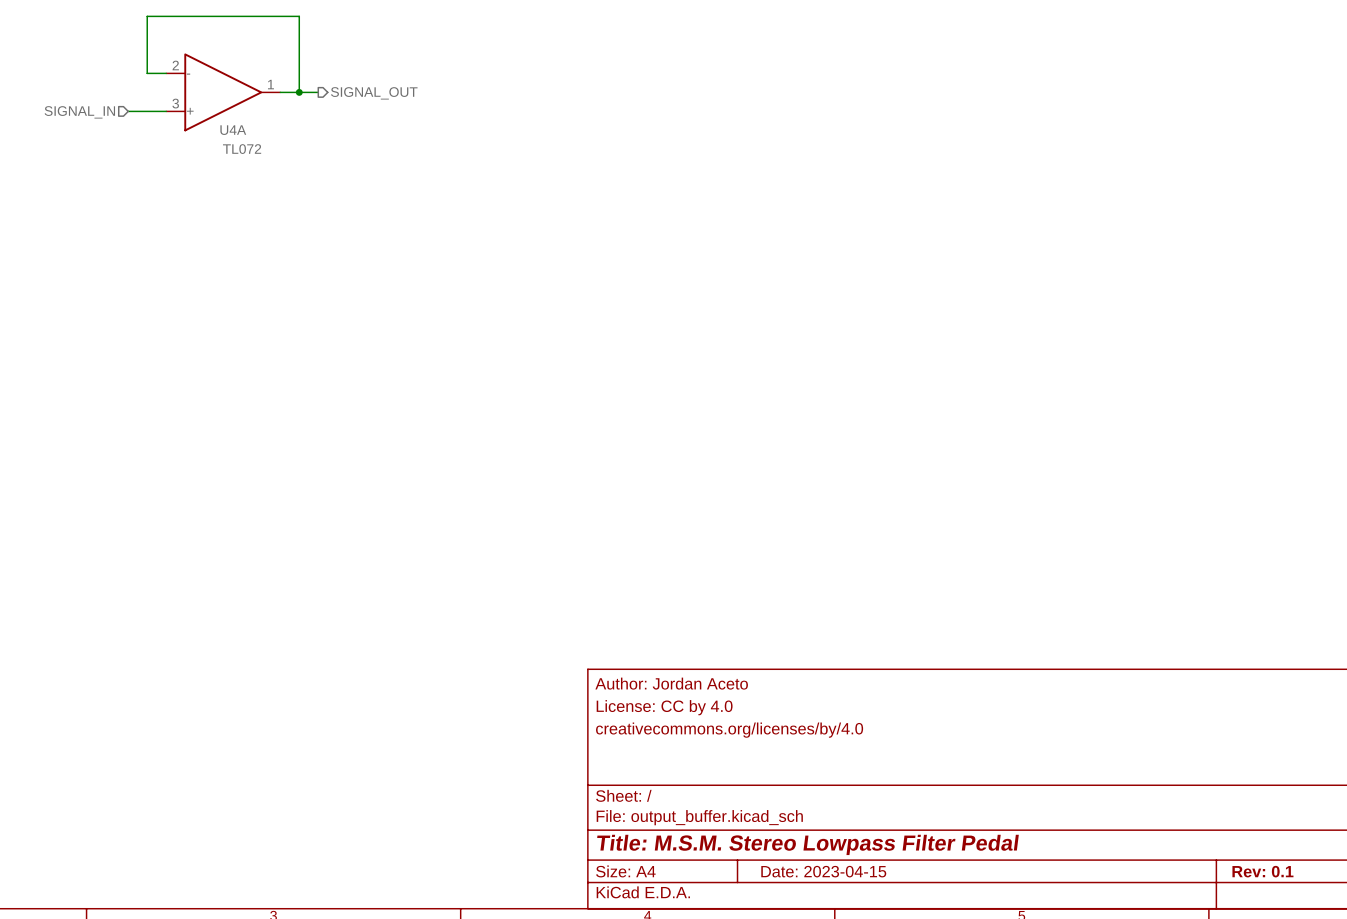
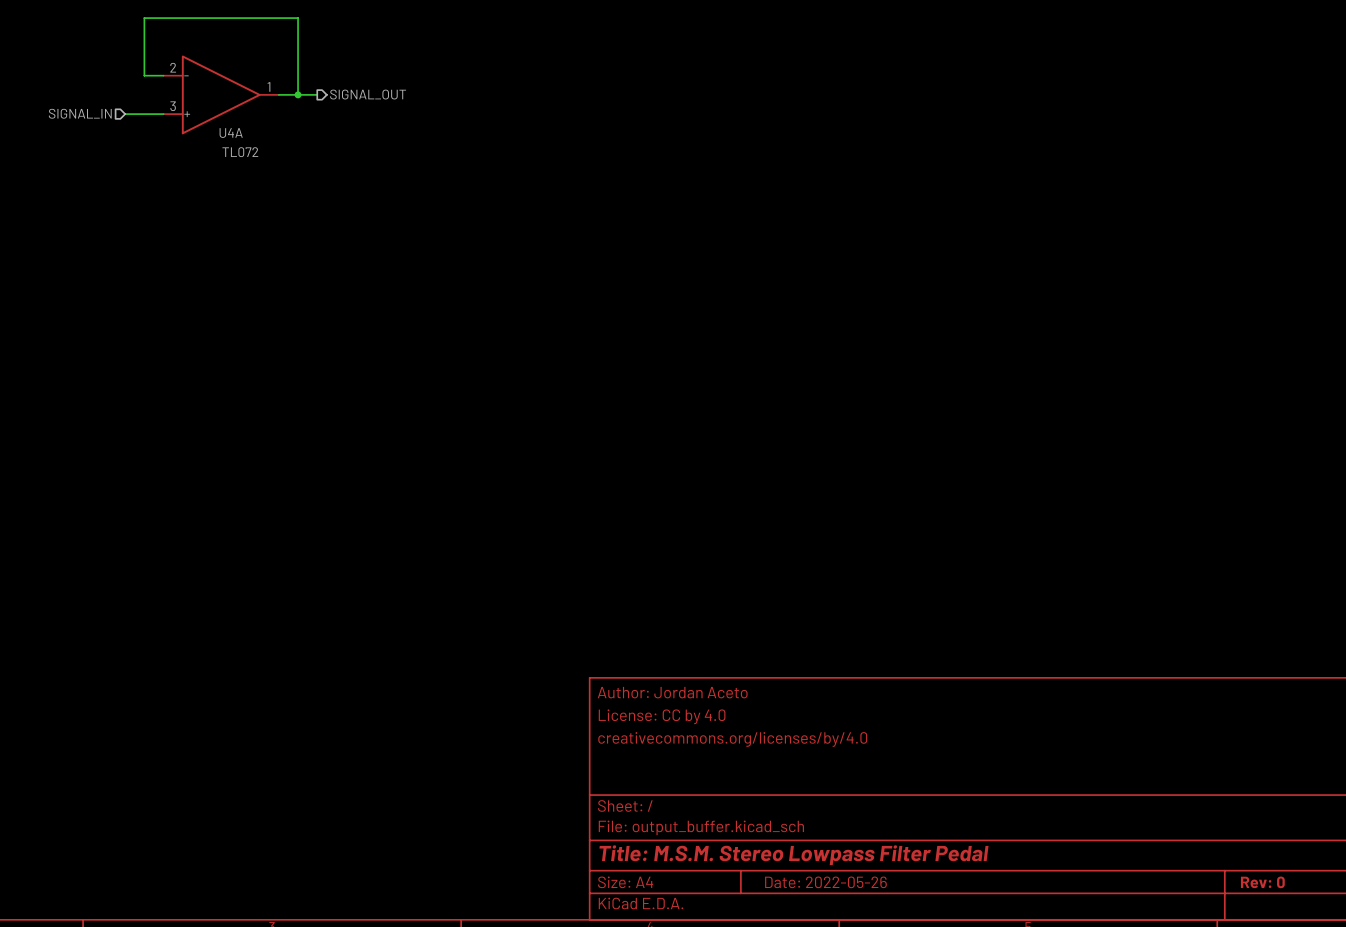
title block: Date: 2023-04-15 (823, 871) -> Date: 2022-05-26 (825, 882)
title block: Rev: 0.1 (1262, 871) -> Rev: 0 (1262, 882)

